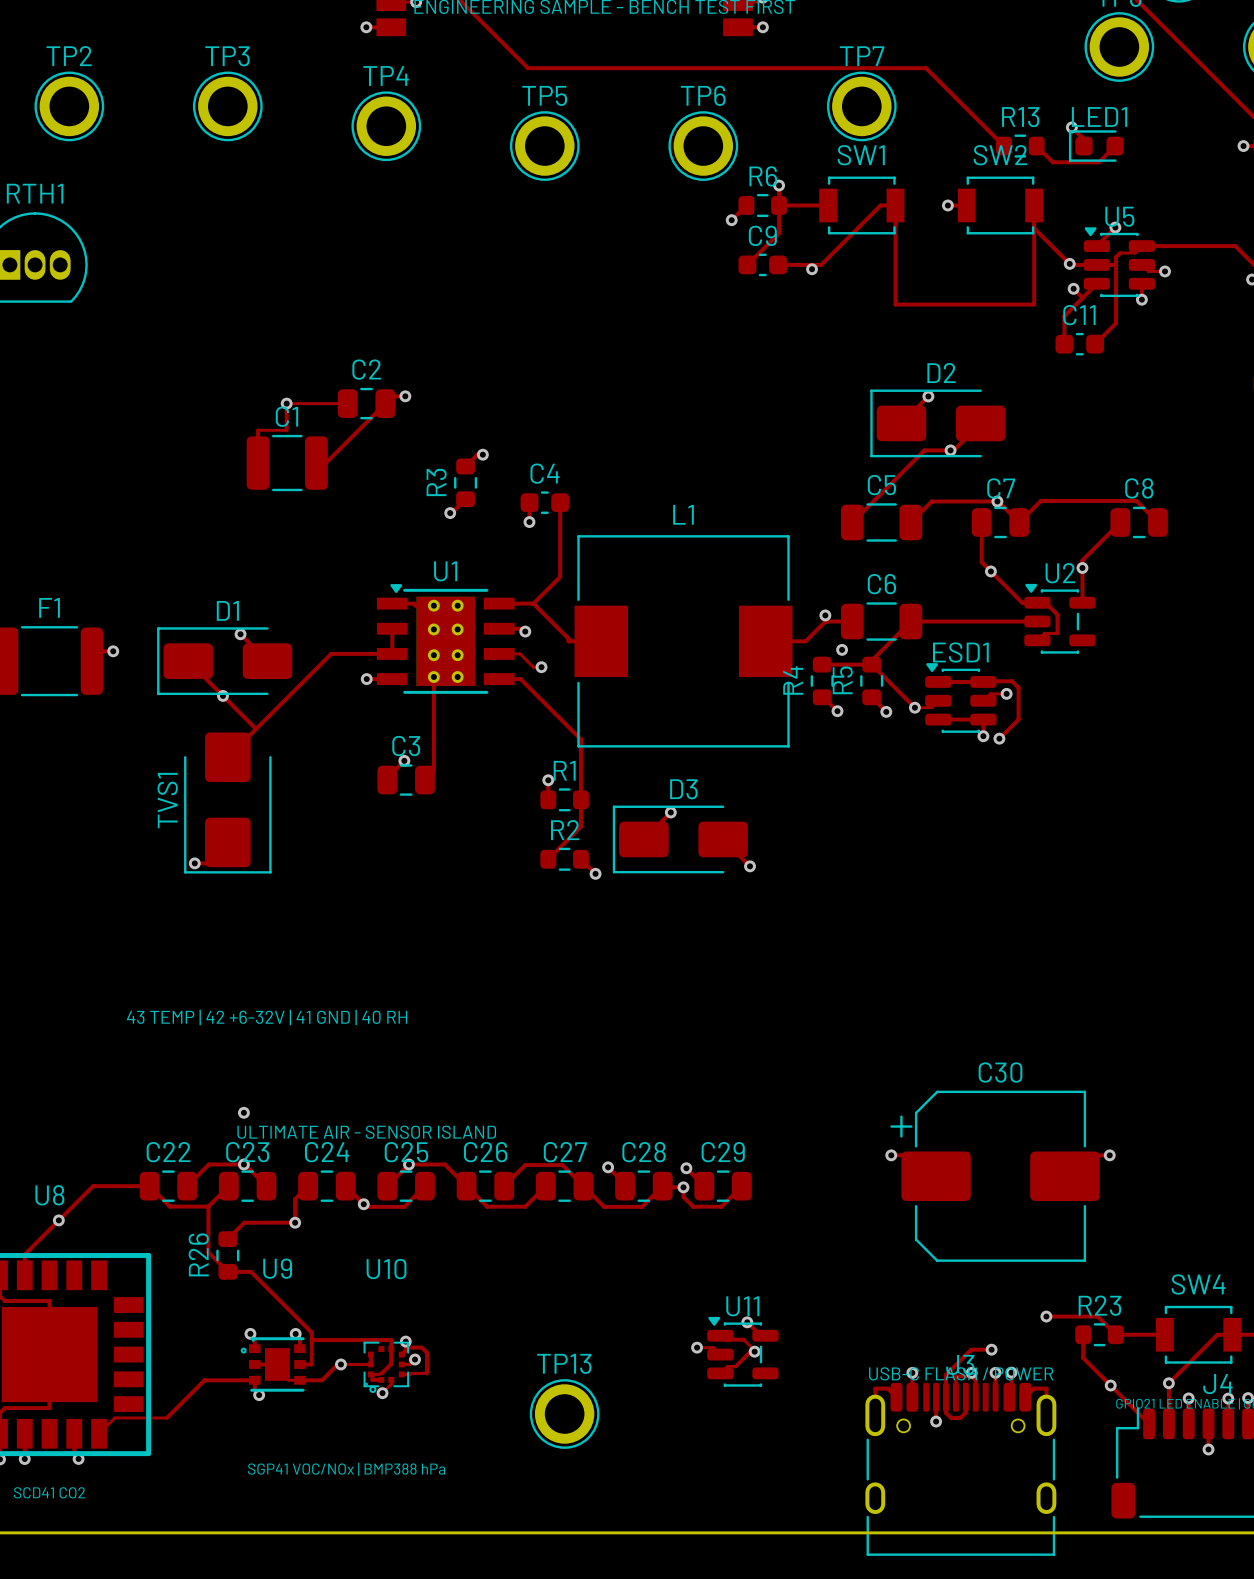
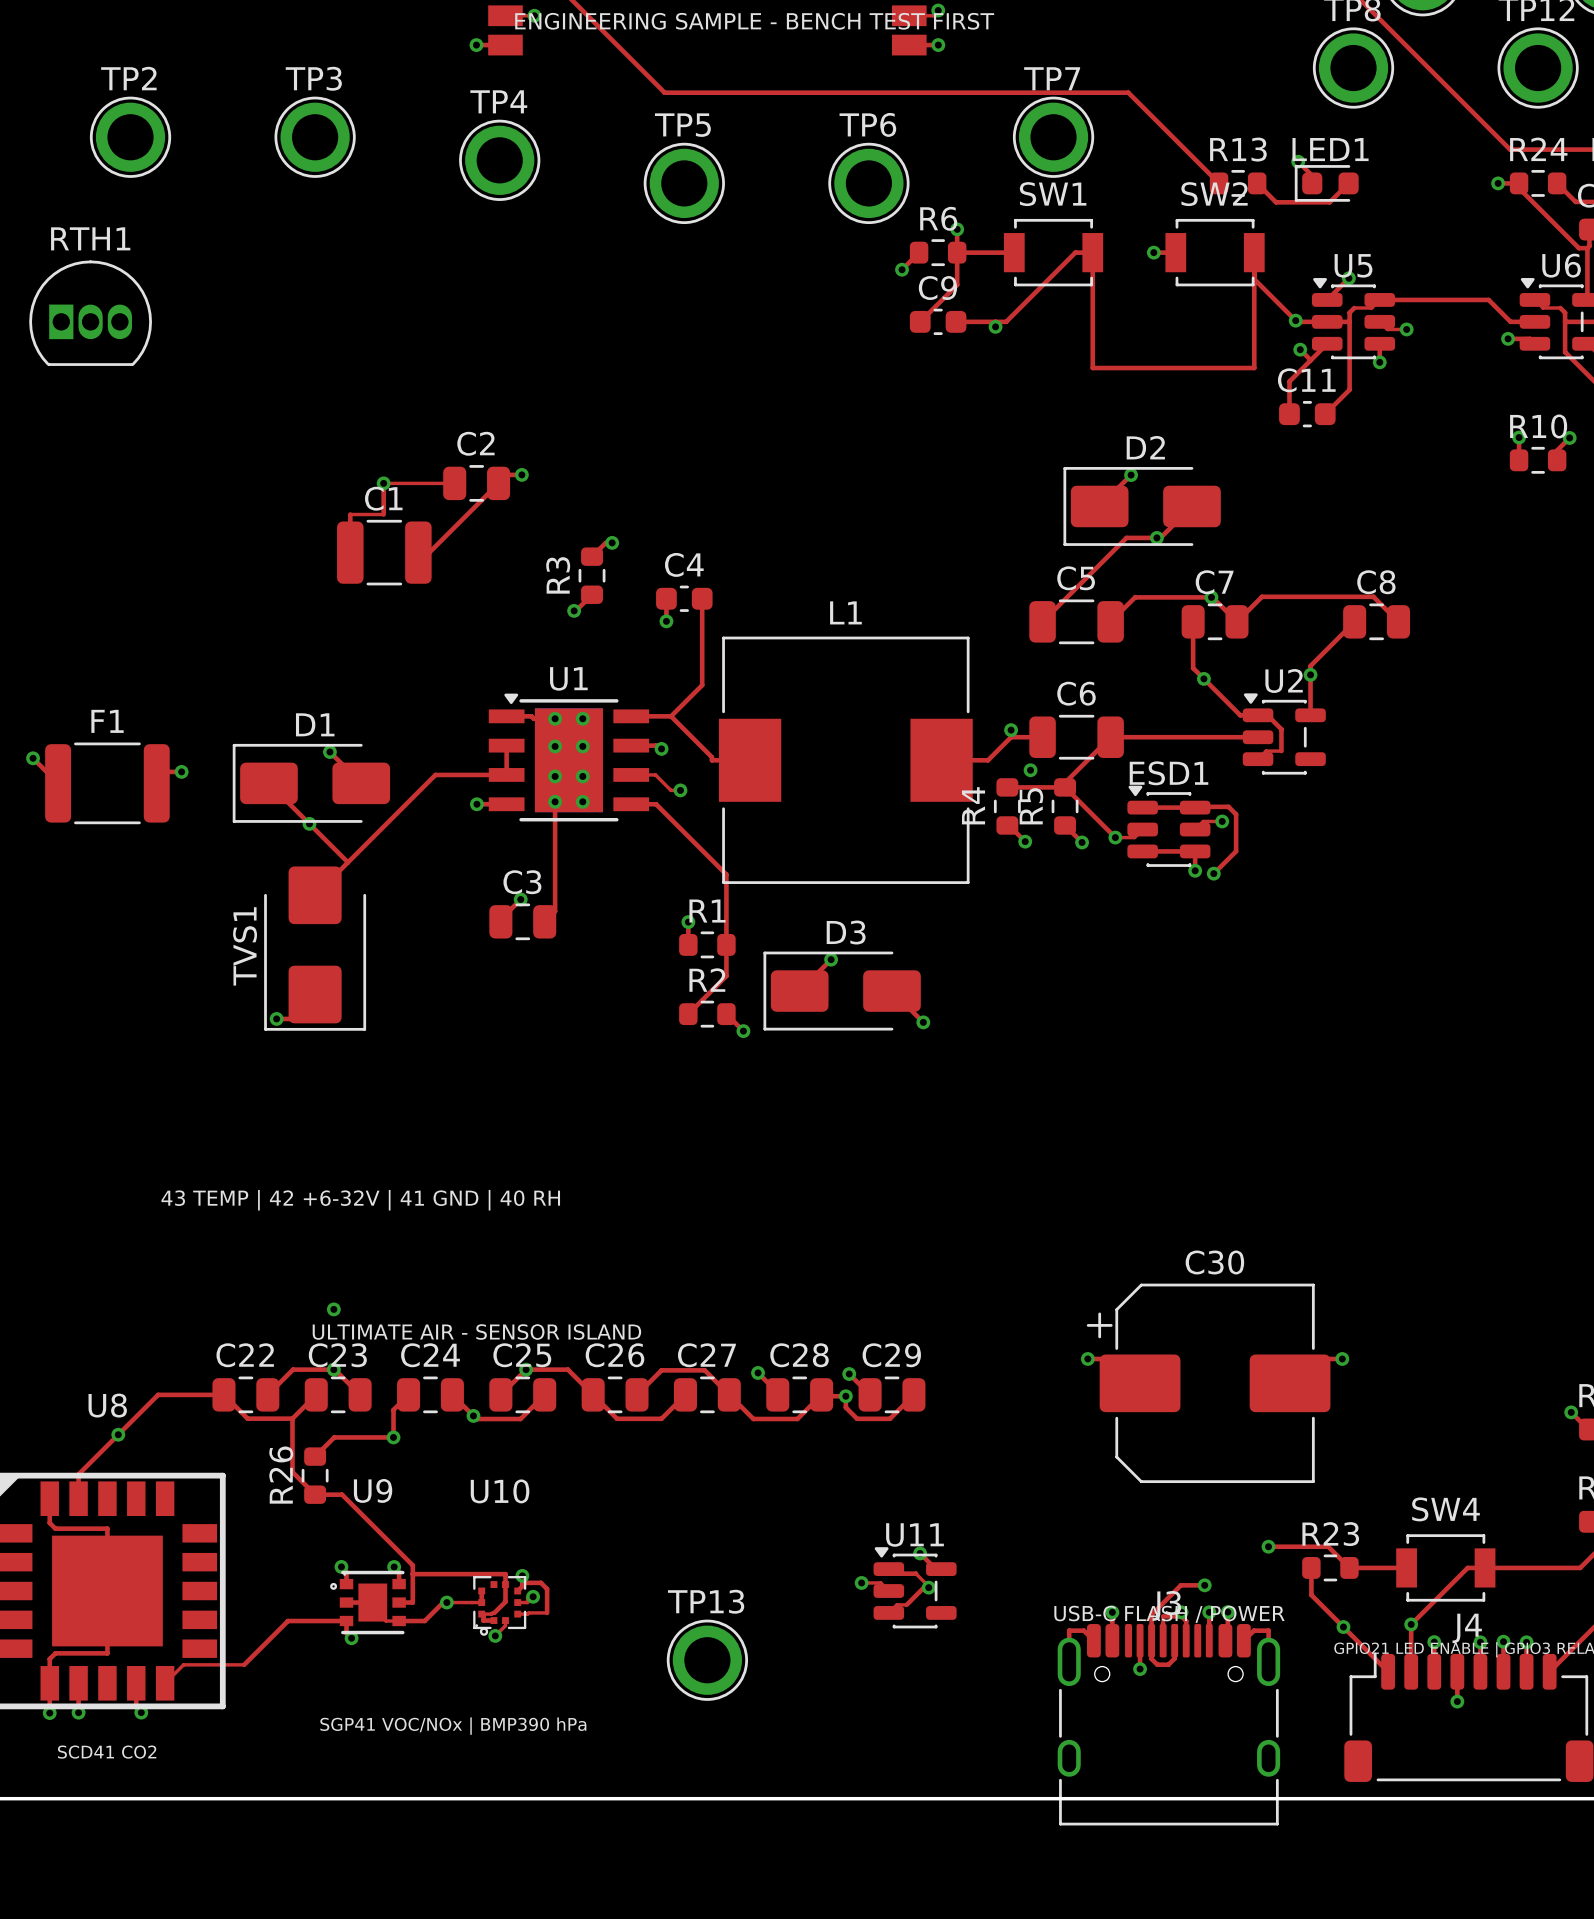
text: SGP41 VOC/NOx | BMP388 hPa (346, 1469) -> SGP41 VOC/NOx | BMP390 hPa (453, 1726)

